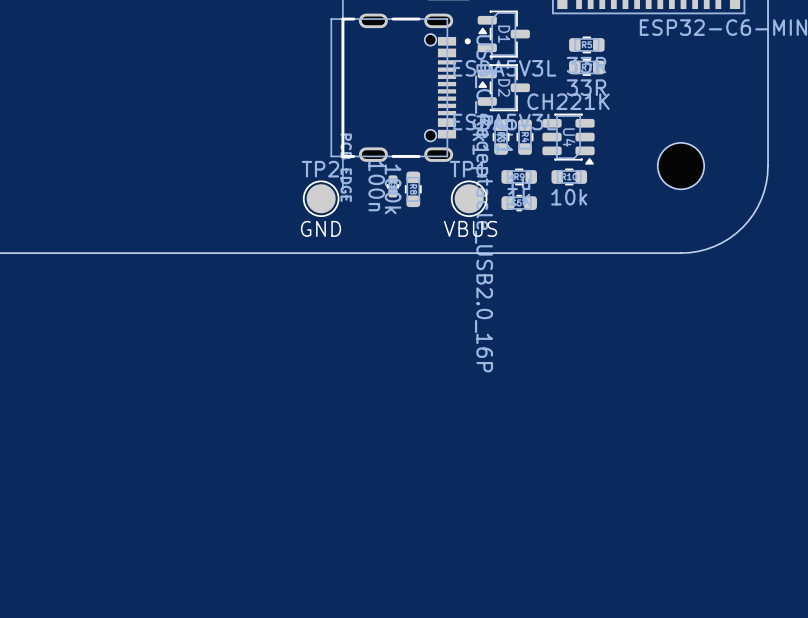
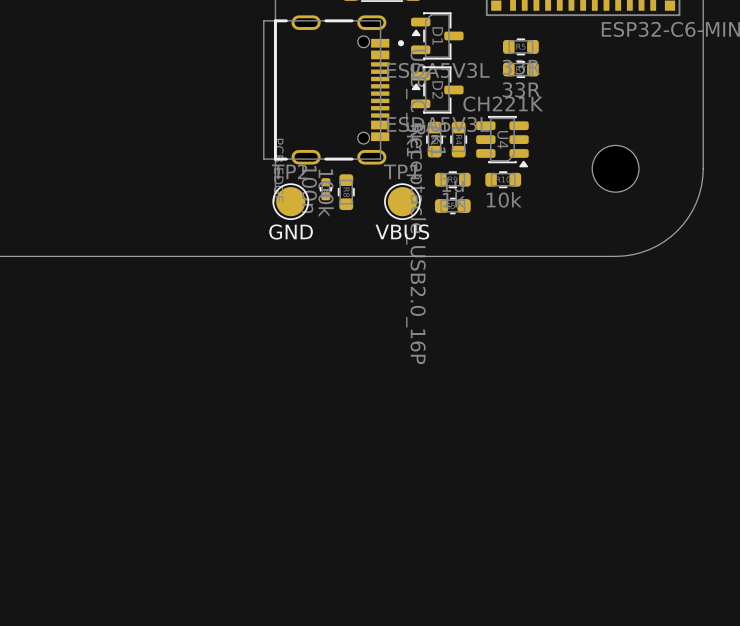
TP2 position: (321, 198) -> (290, 201)
text position: GND (321, 228) -> GND (291, 231)

